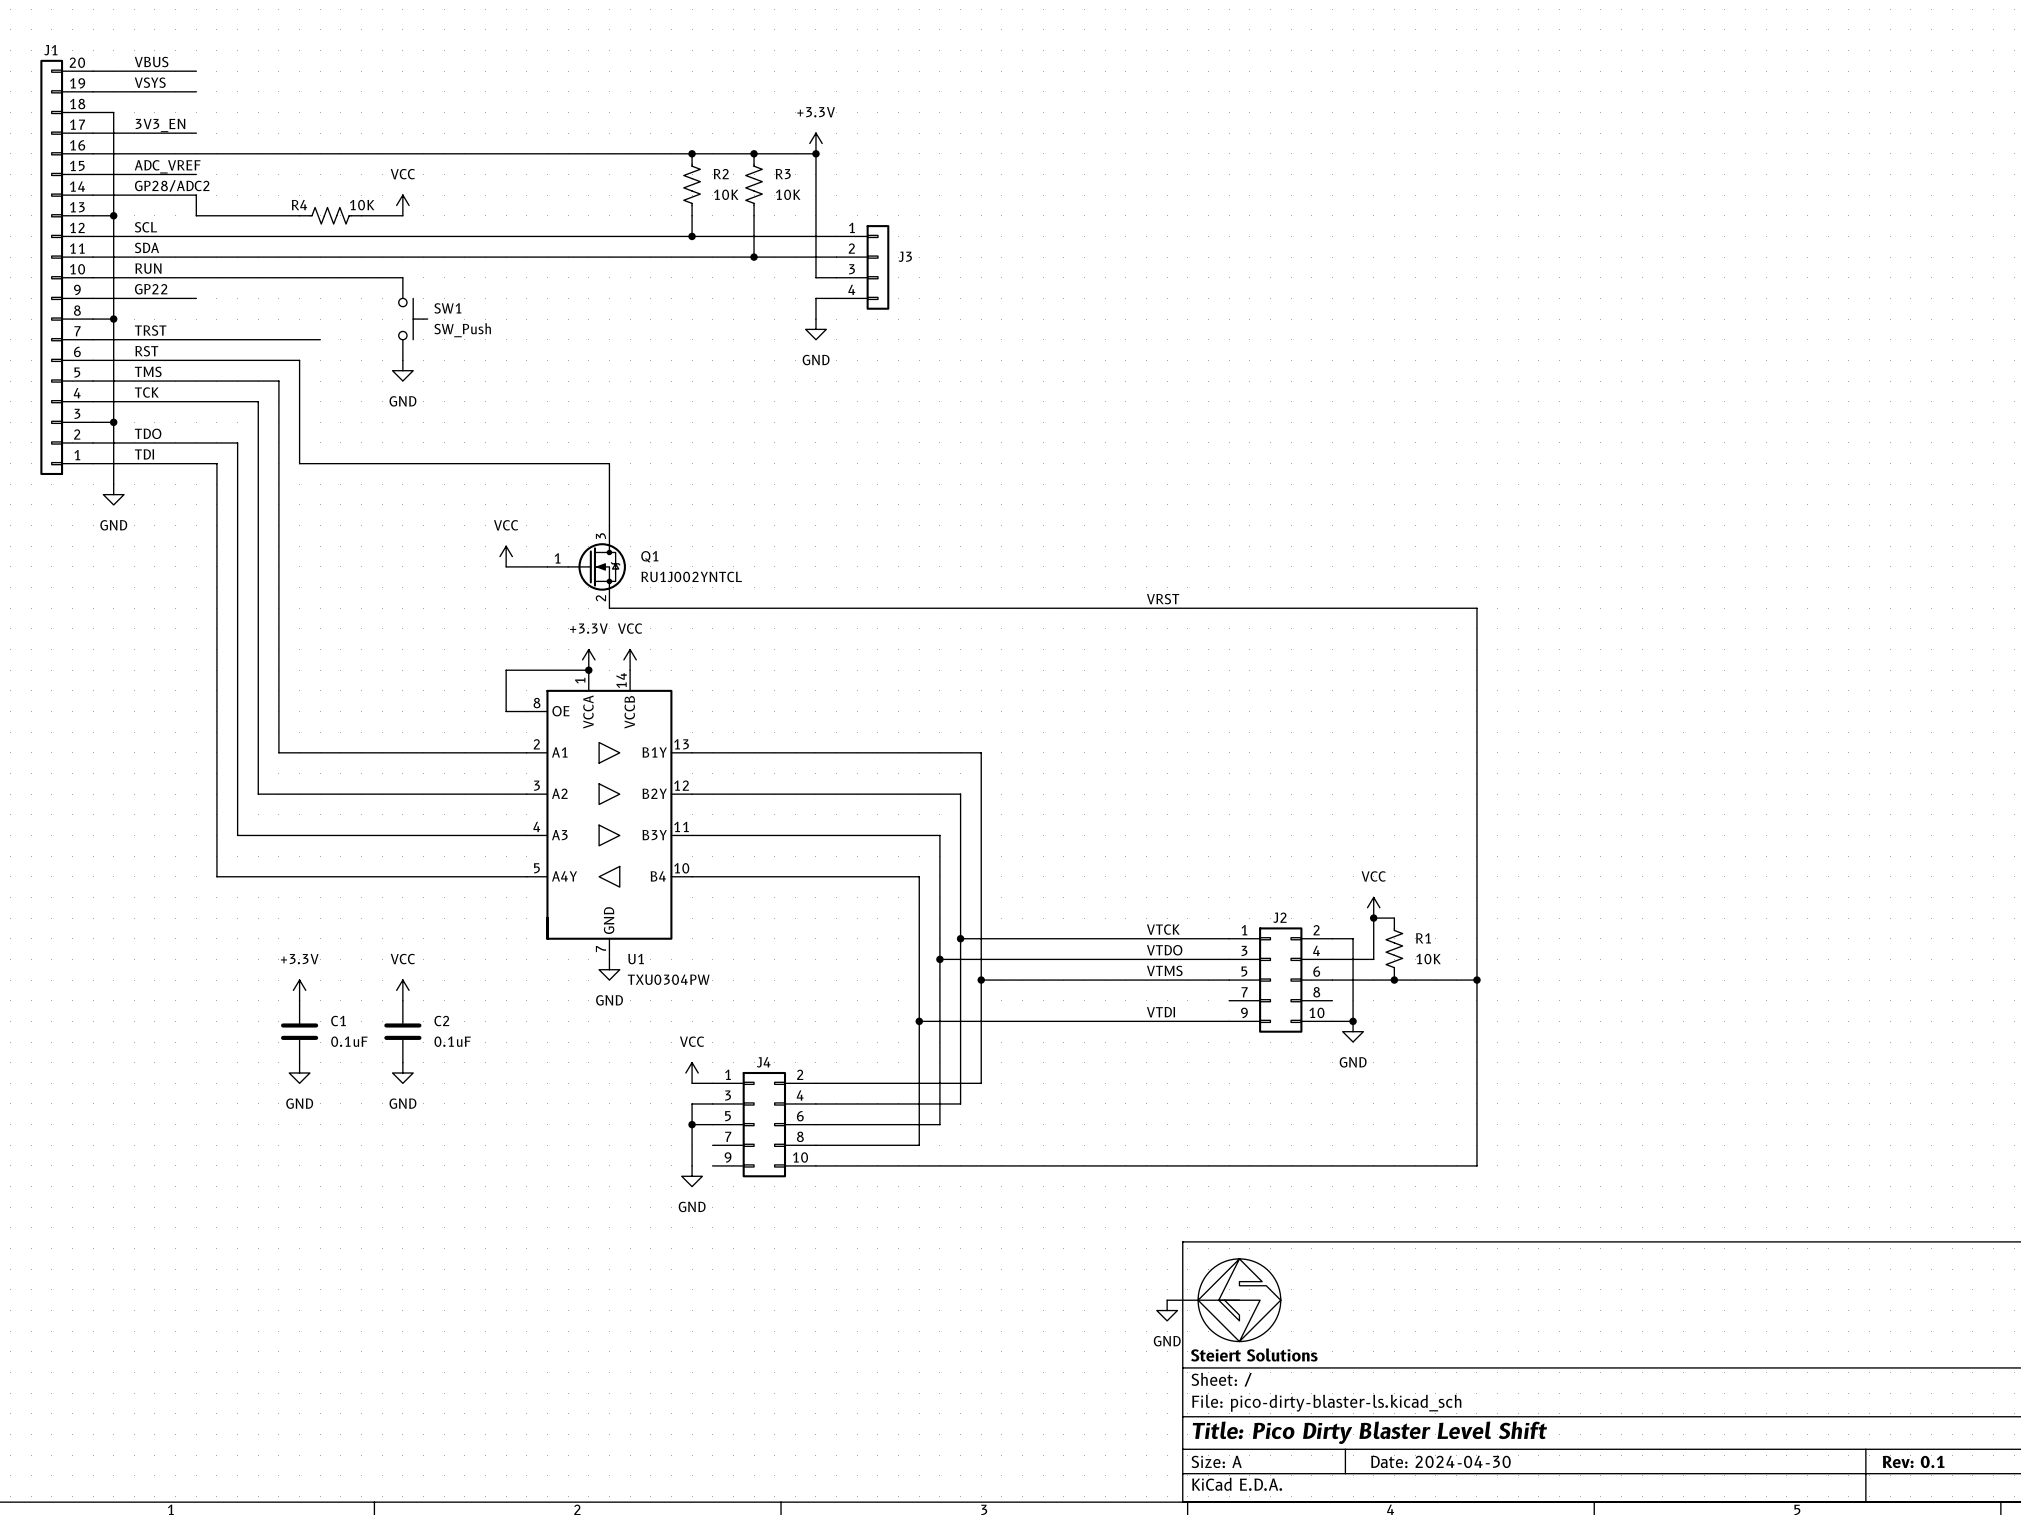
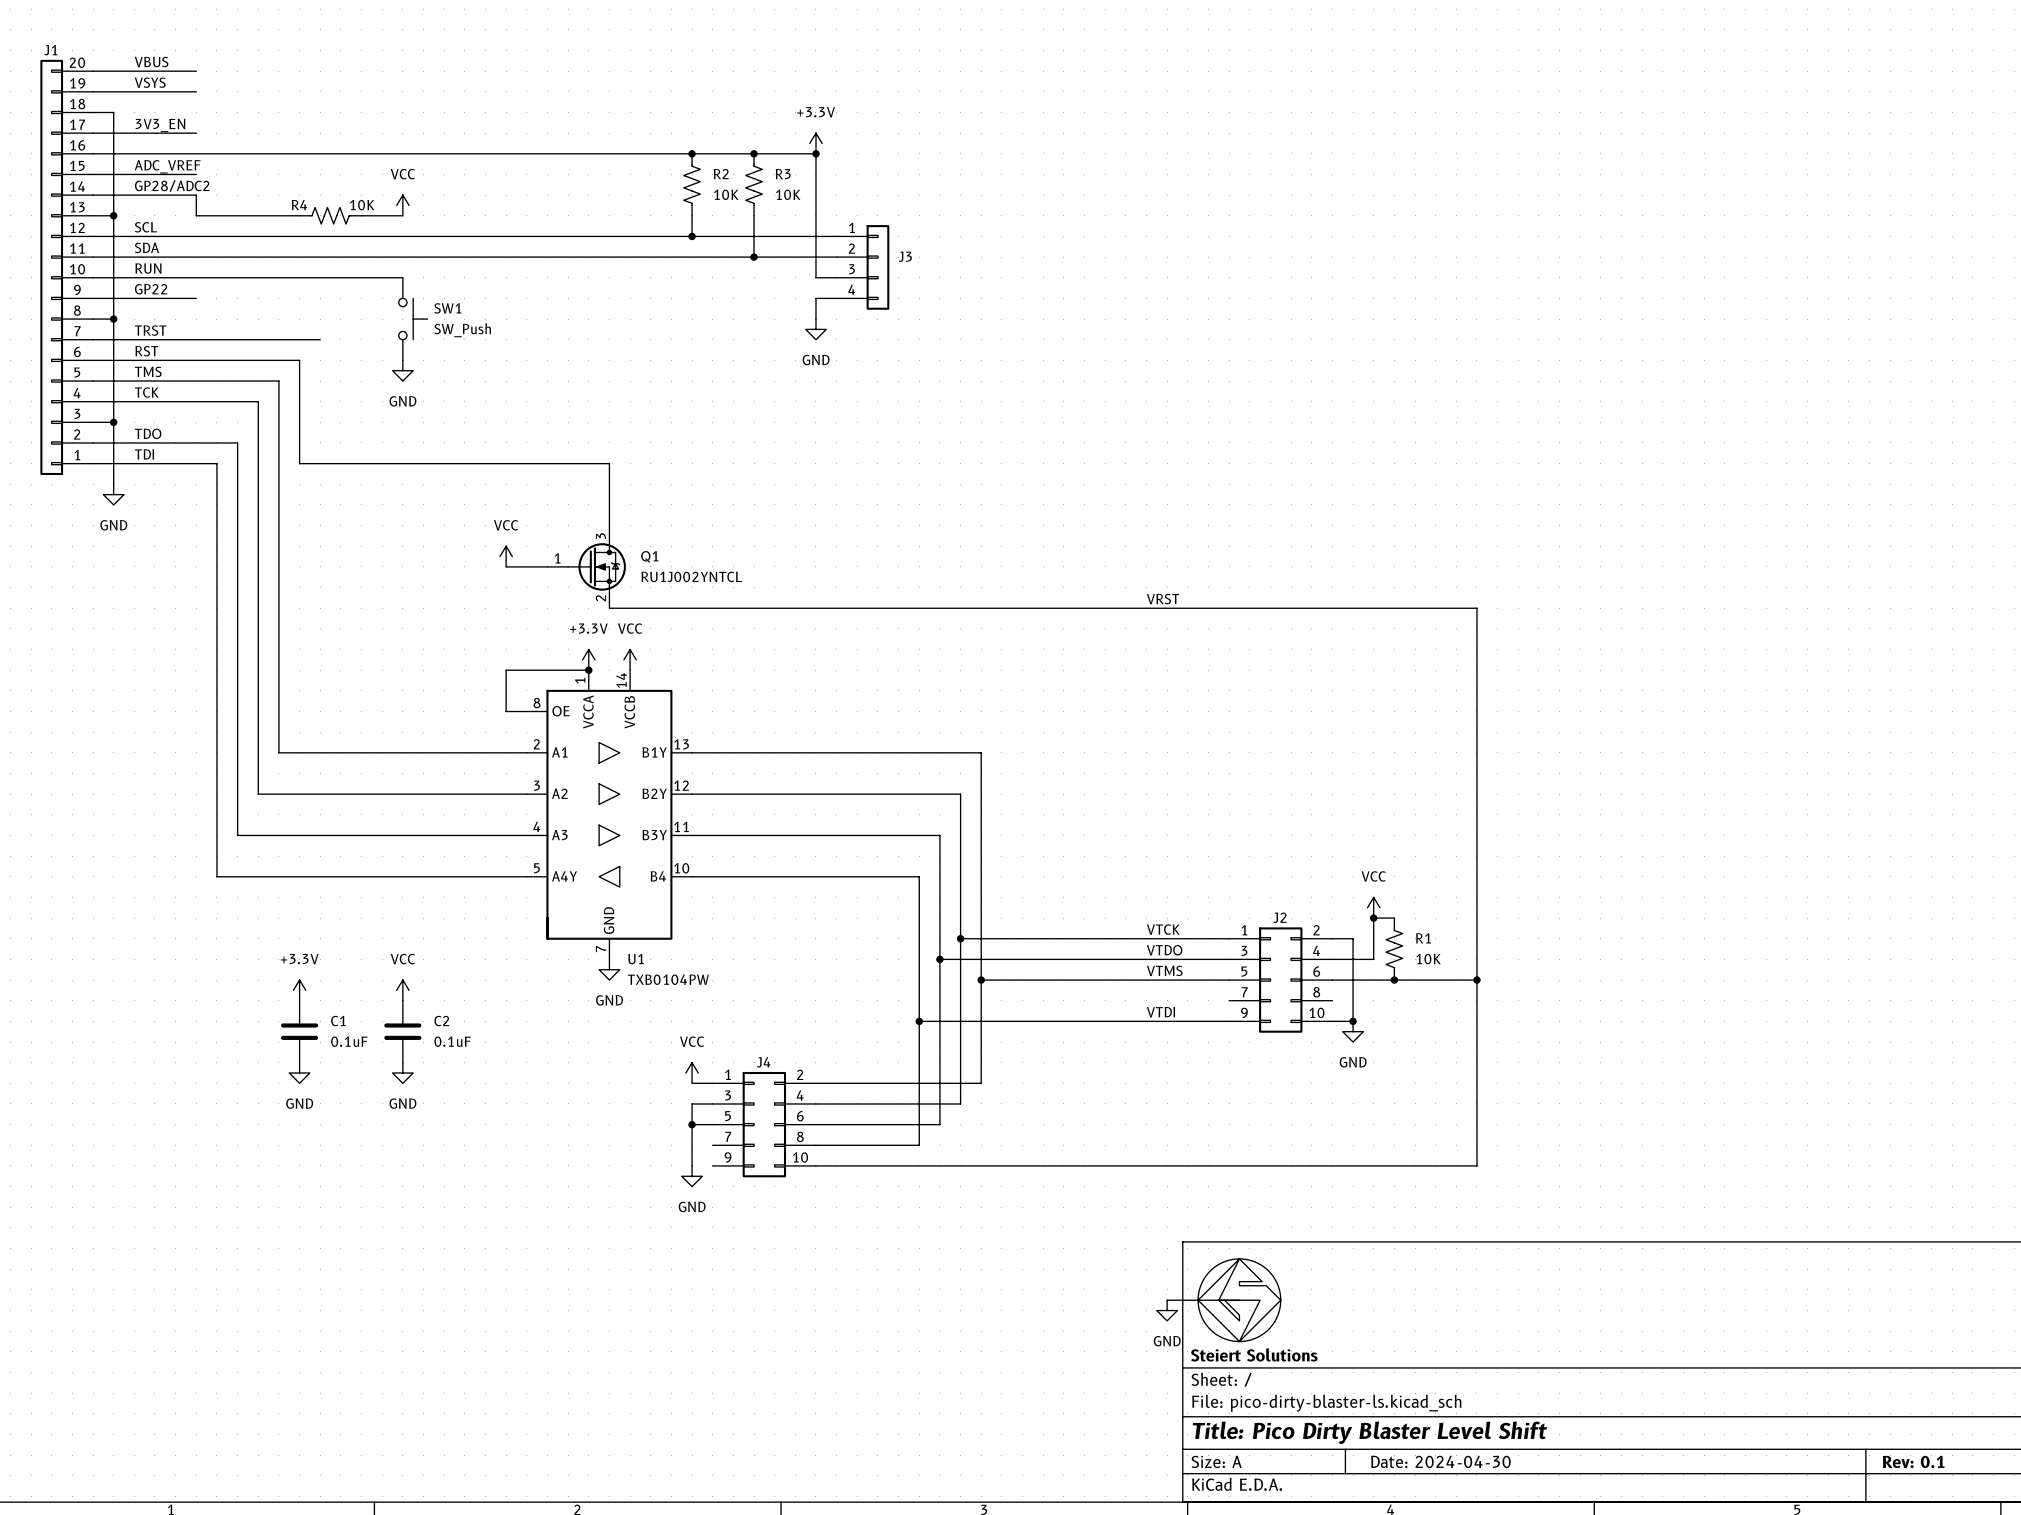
U1 value: TXU0304PW (668, 979) -> TXB0104PW (668, 979)

